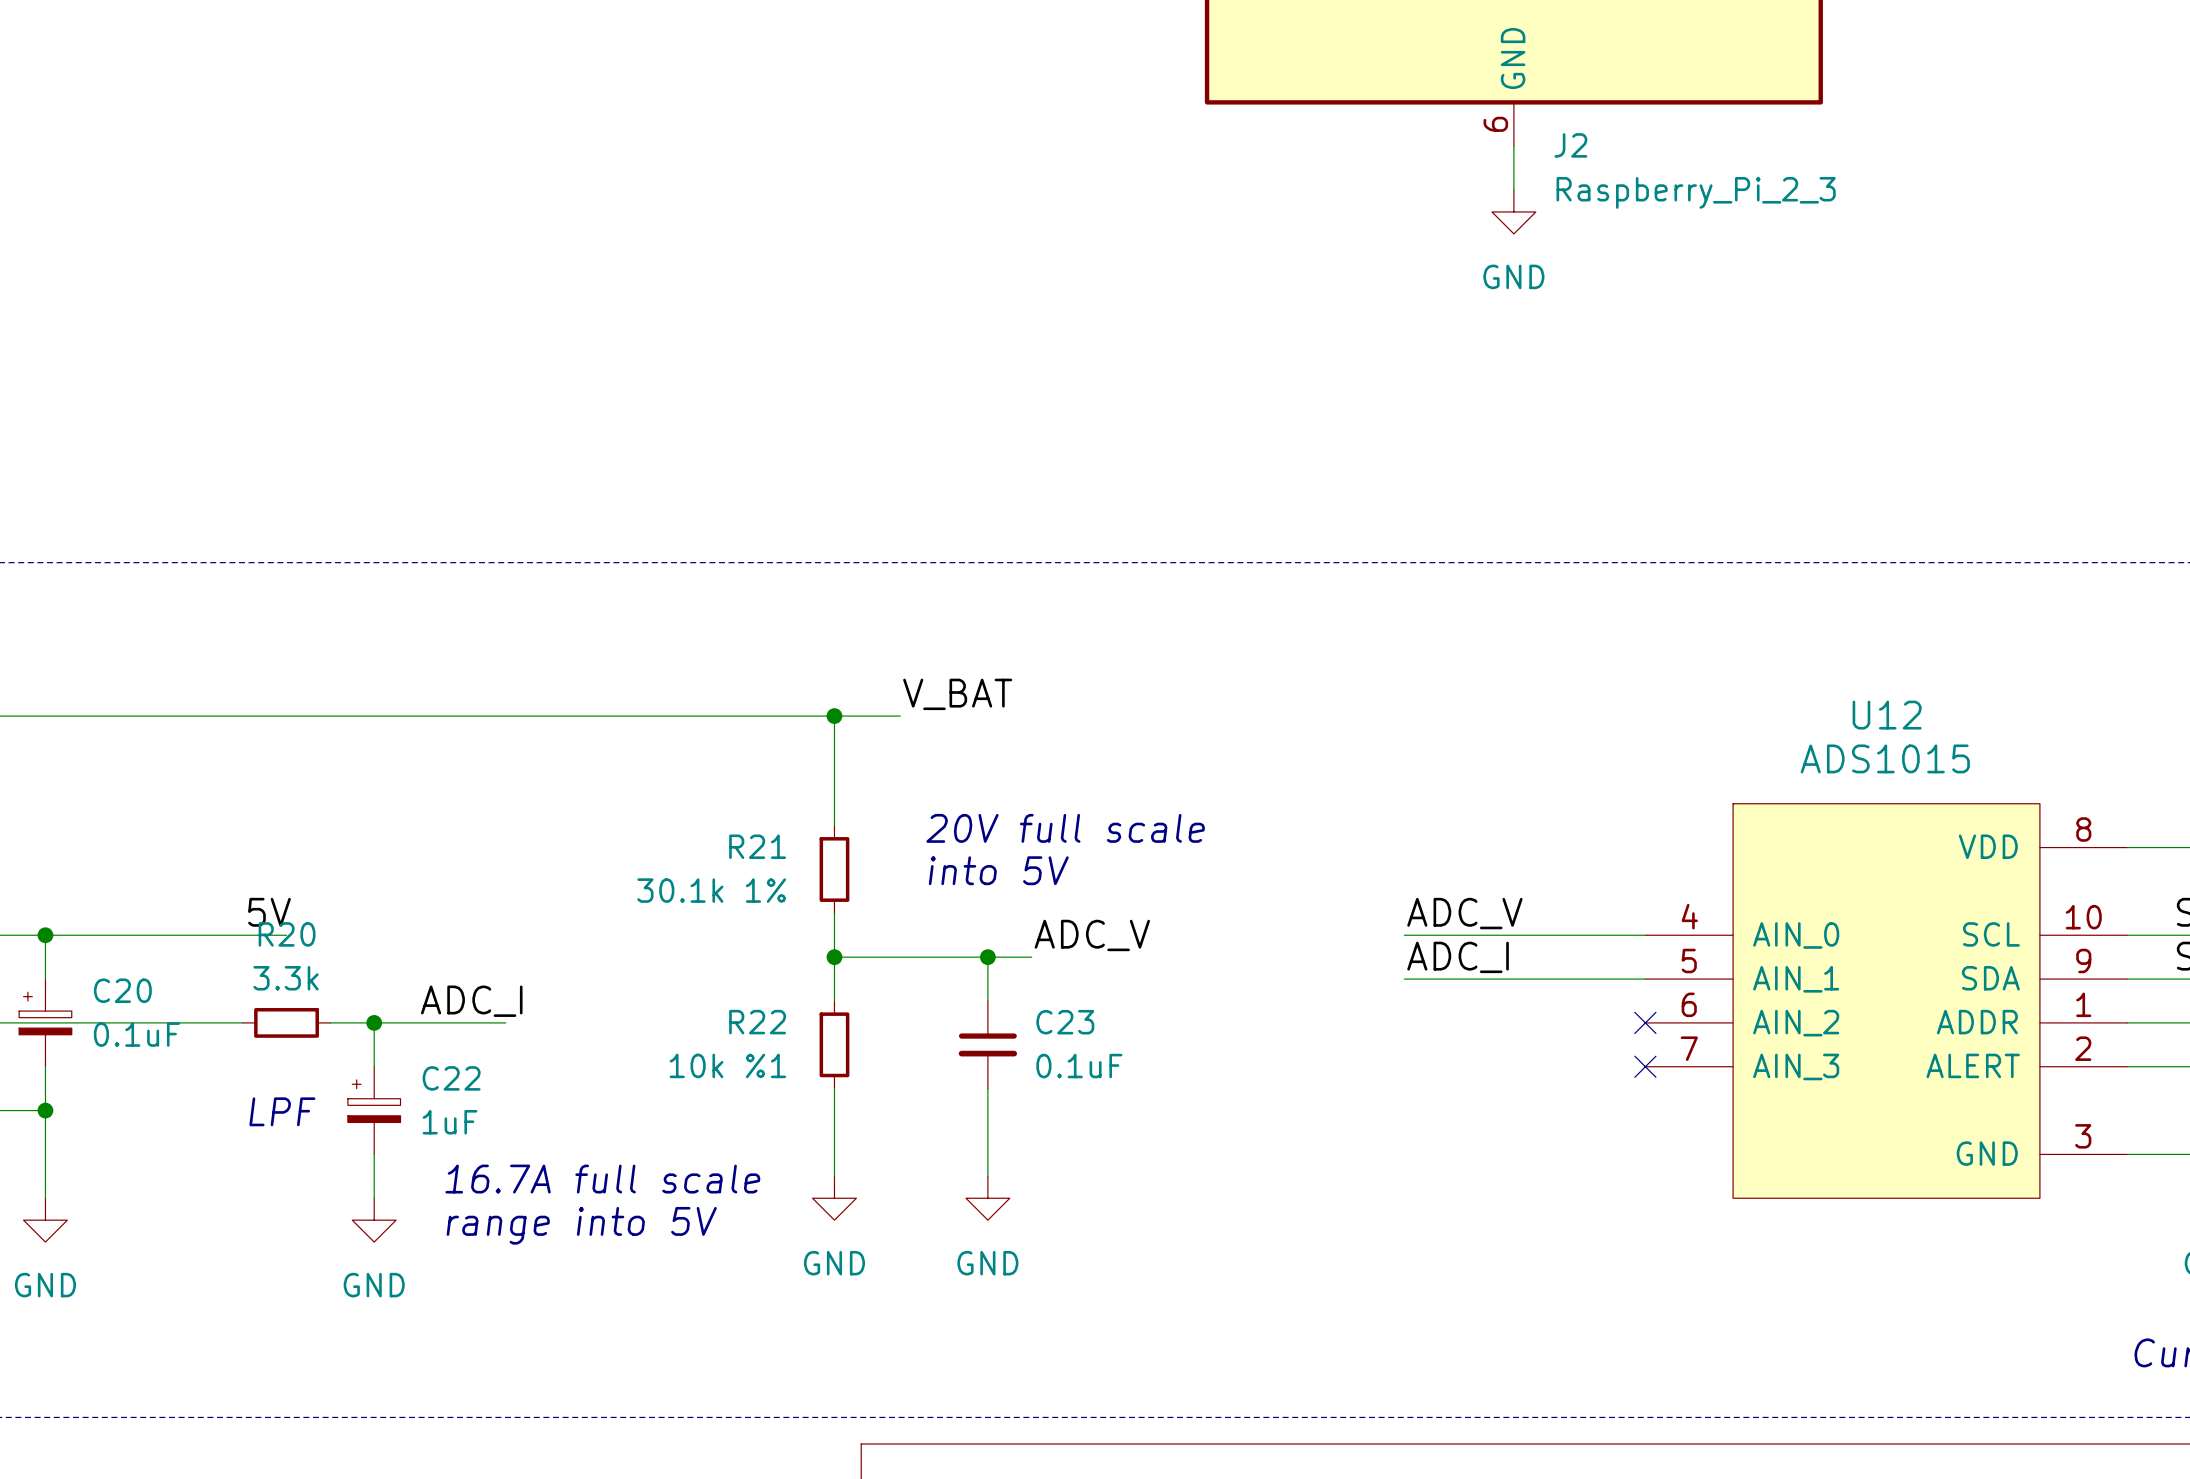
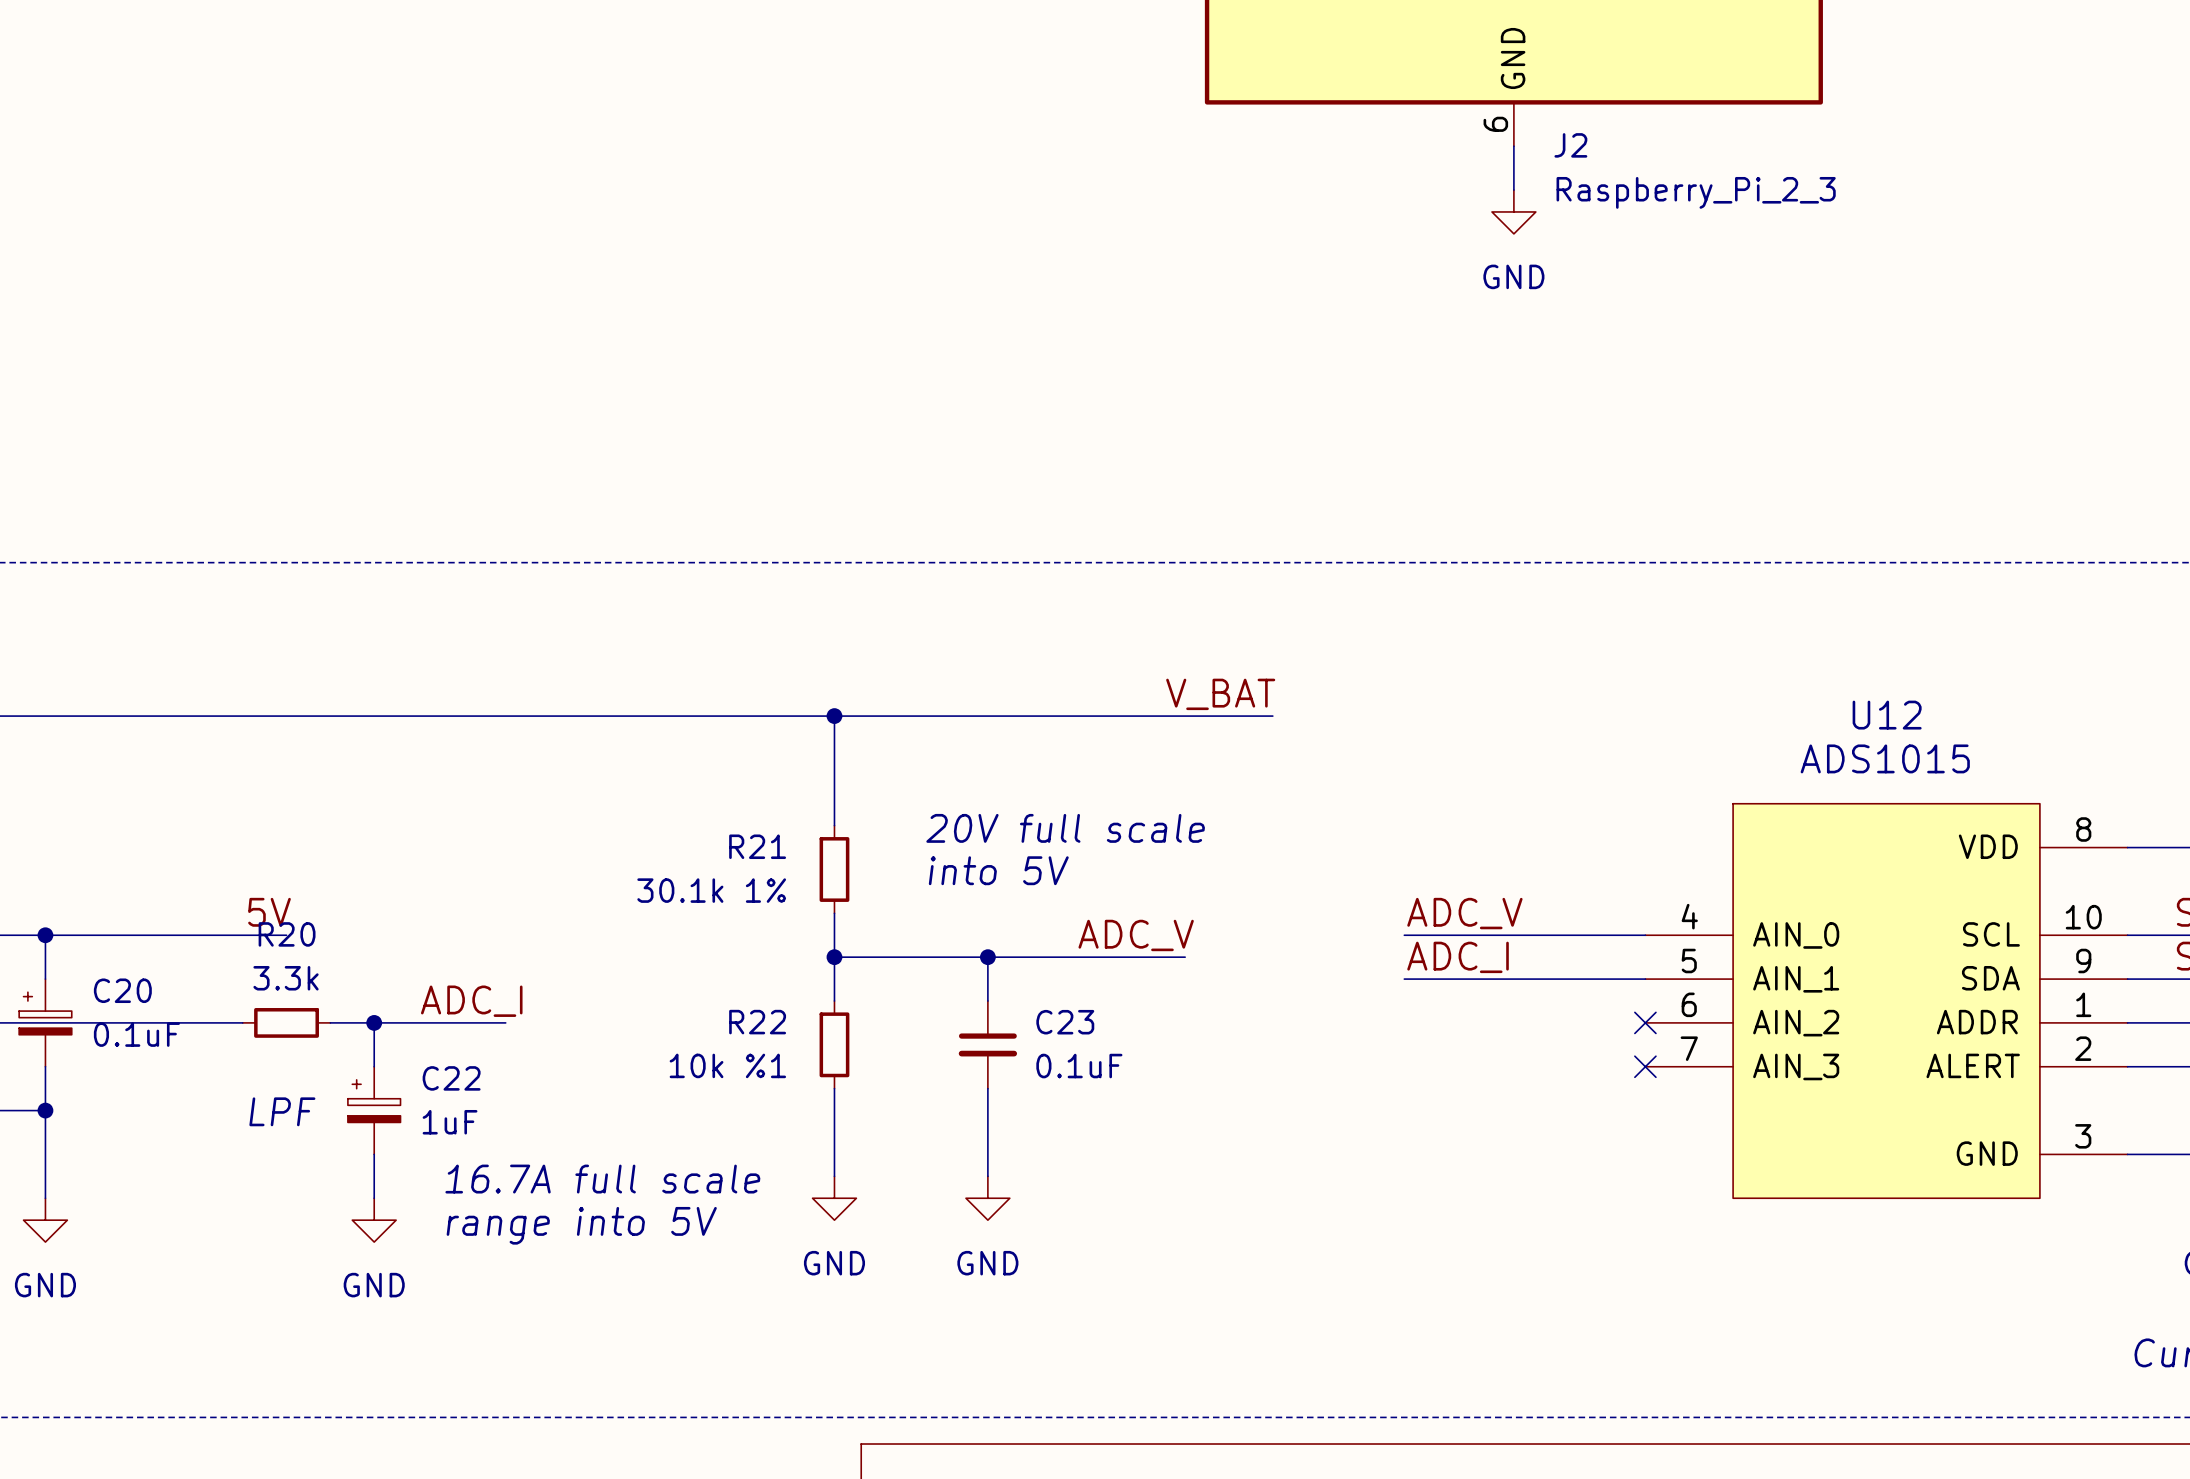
label position: V_BAT (957, 694) -> V_BAT (1220, 694)
wire: none -> (900, 716) (1272, 716)
label position: ADC_V (1092, 935) -> ADC_V (1136, 935)
wire: none -> (1031, 957) (1185, 957)

